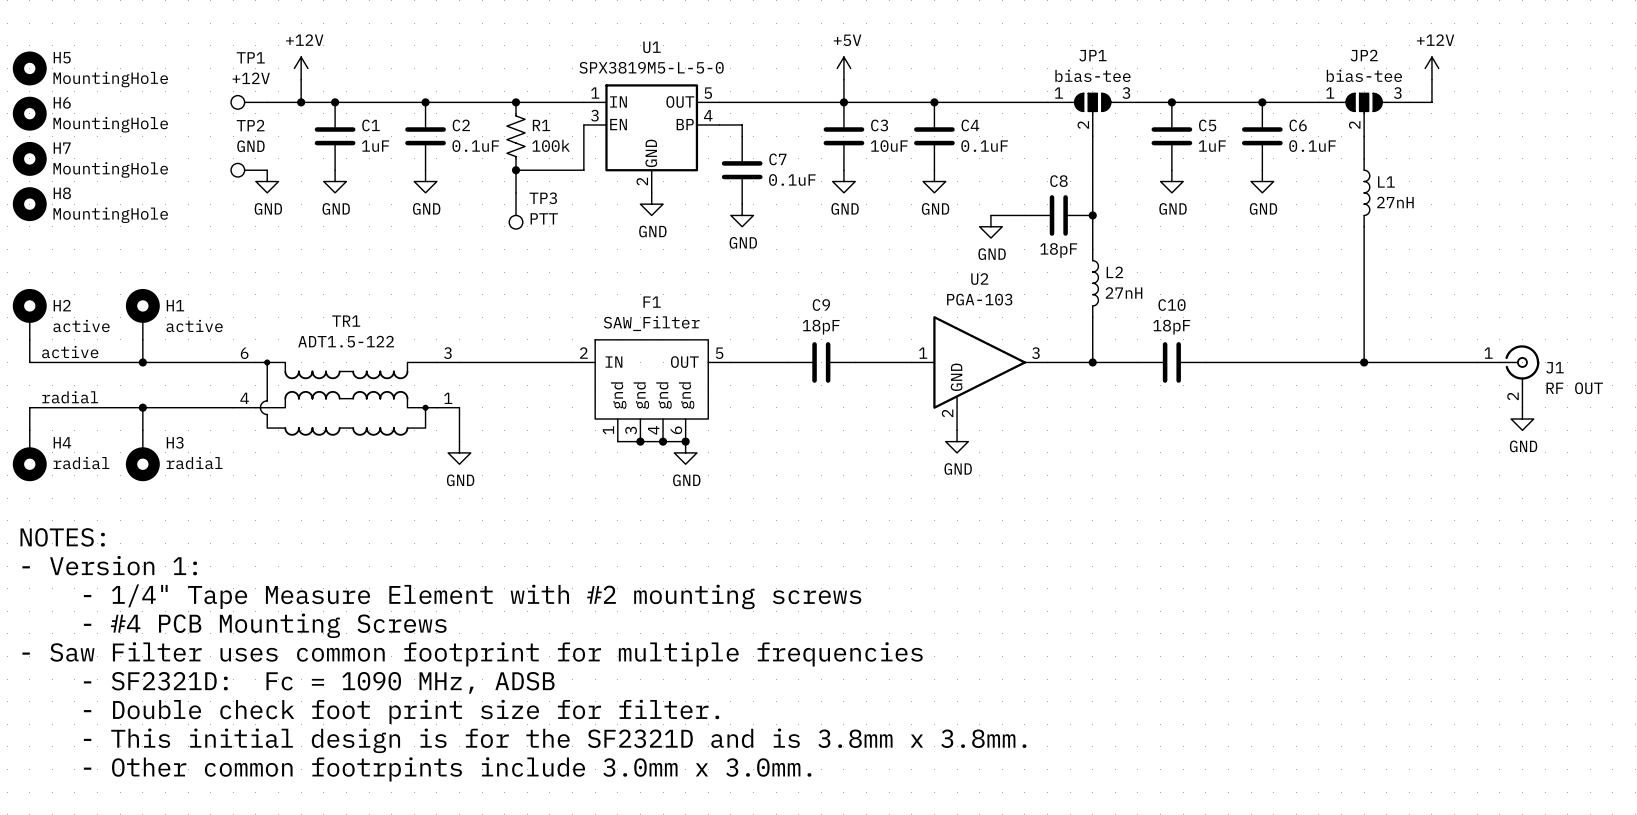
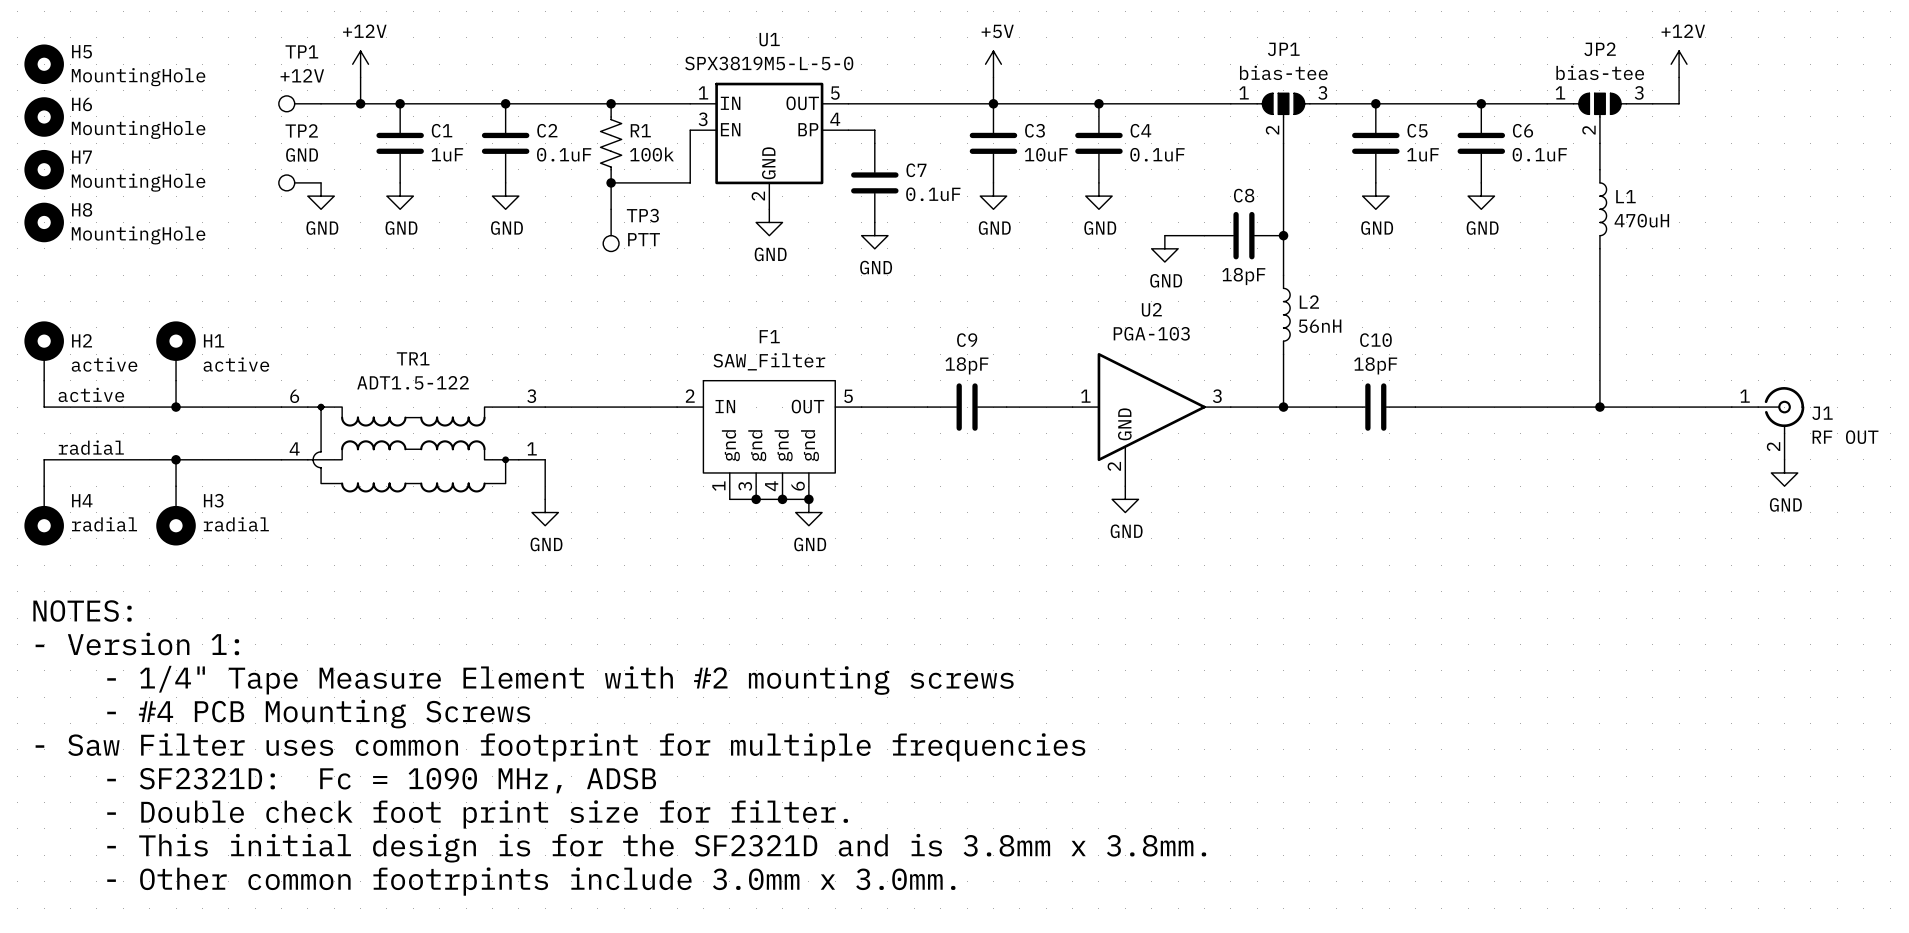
L1 value: 27nH (1395, 202) -> 470uH (1641, 220)
L2 value: 27nH (1124, 292) -> 56nH (1320, 326)

